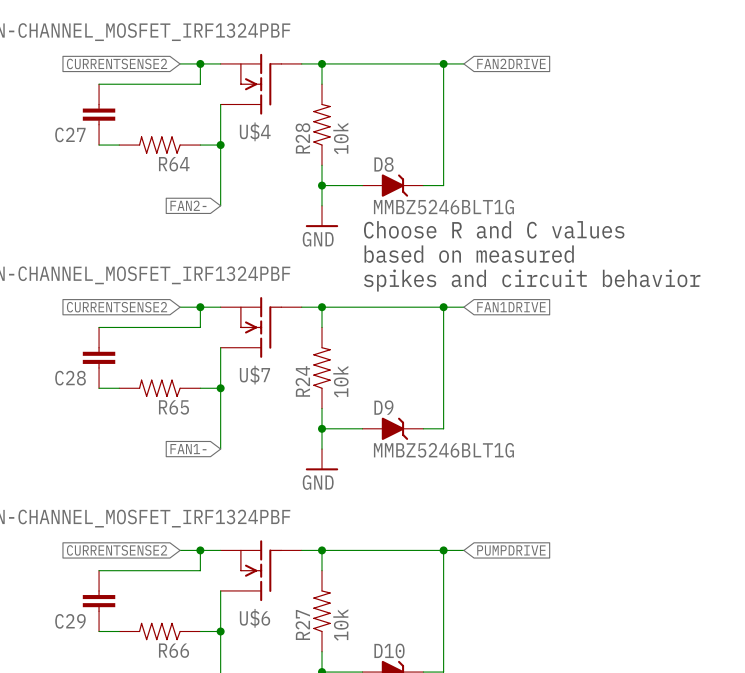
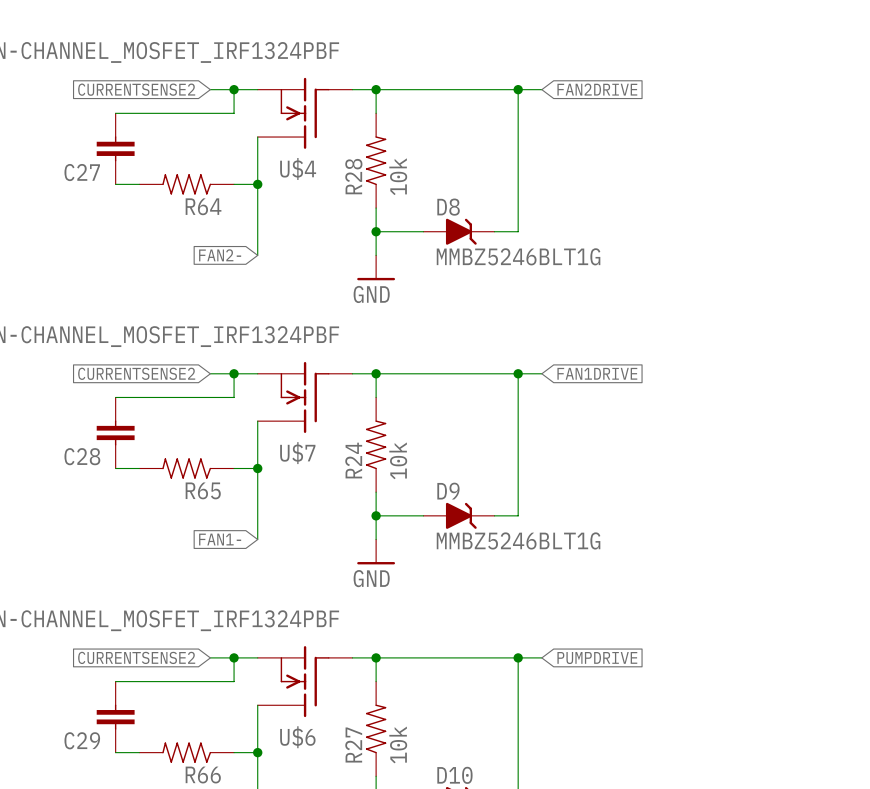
text: Choose R and C values (494, 229) -> none
text: based on measured (469, 254) -> none
text: spikes and circuit behavior (532, 280) -> none

